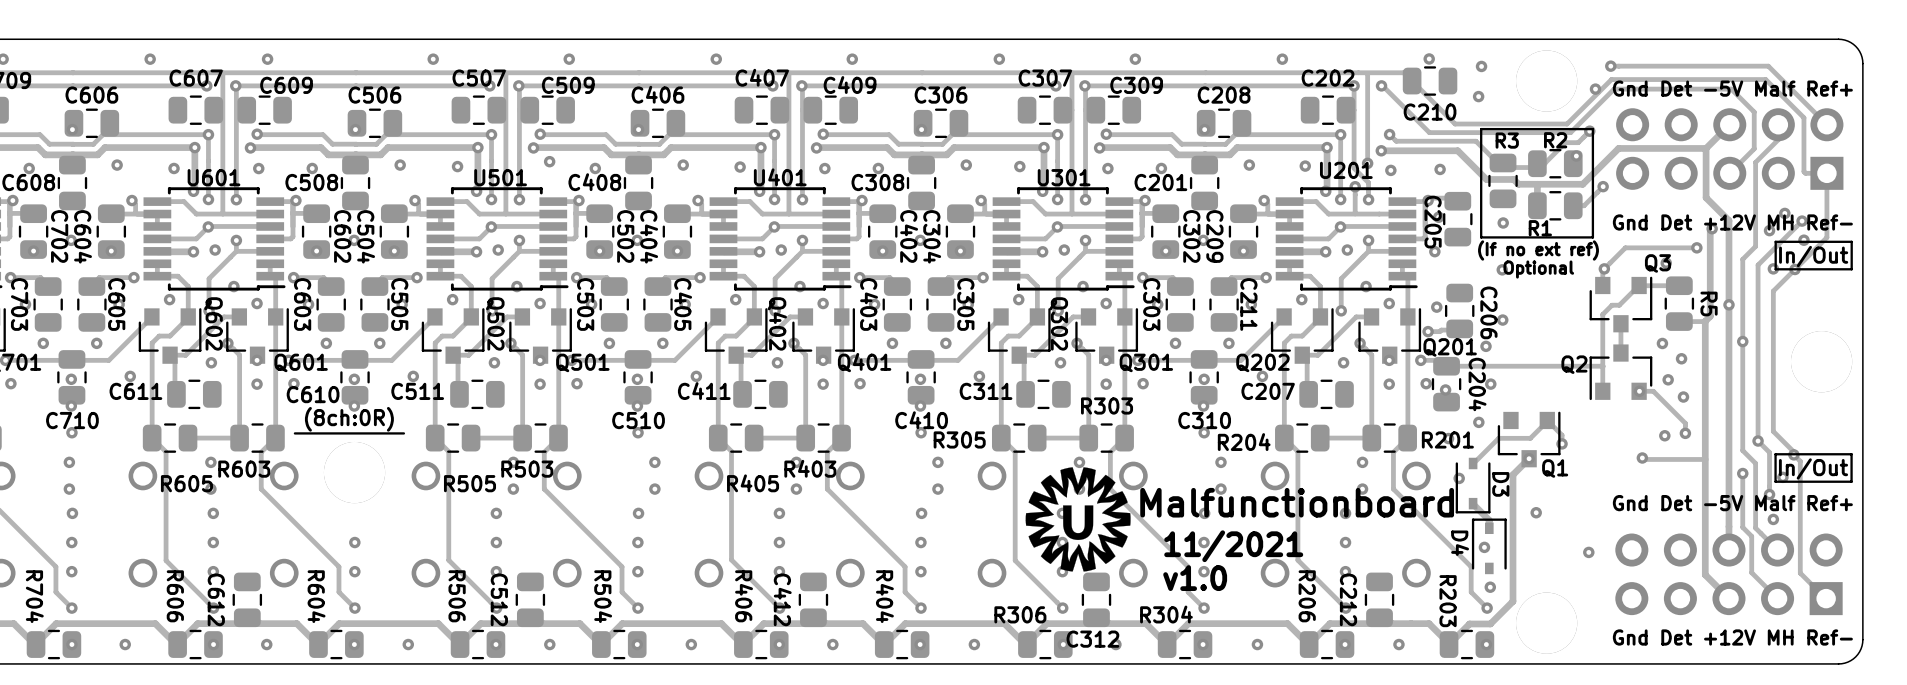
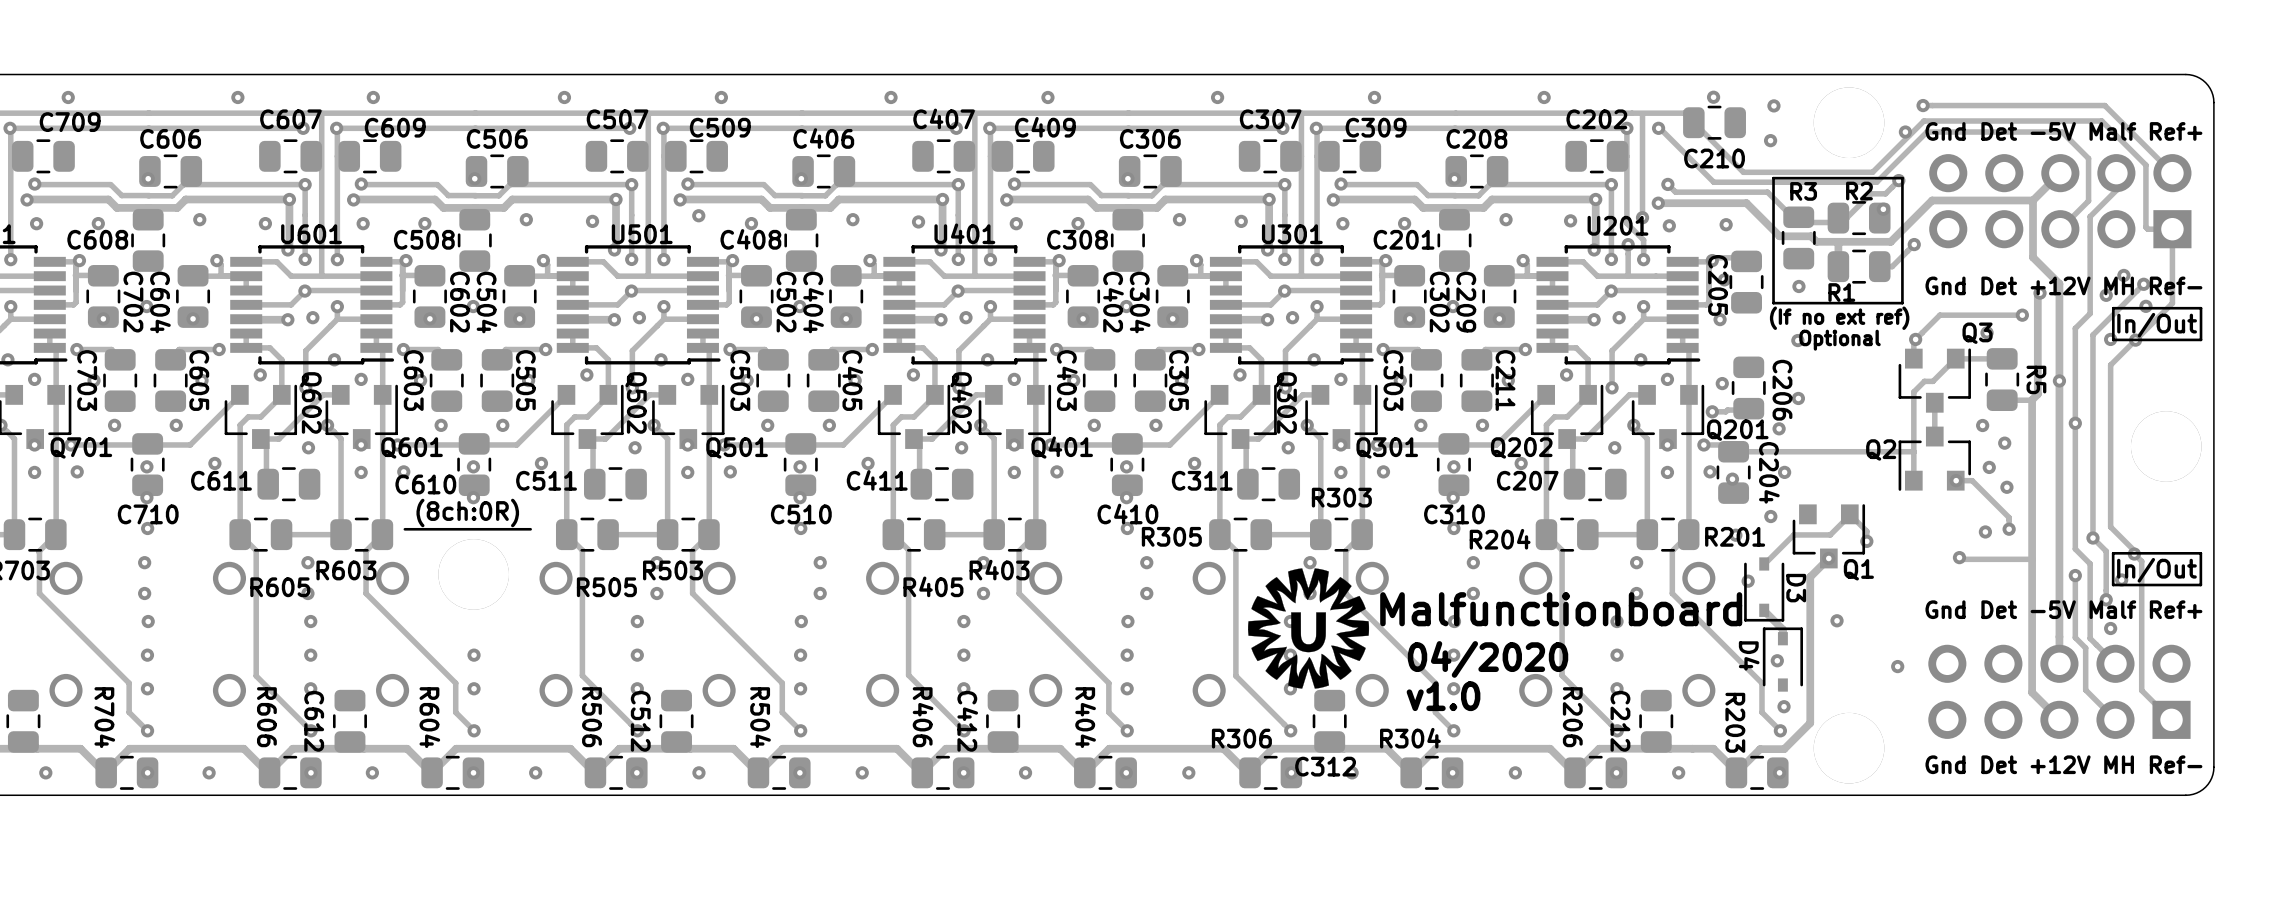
text: 11/2021 (1233, 546) -> 04/2020 (1488, 659)

